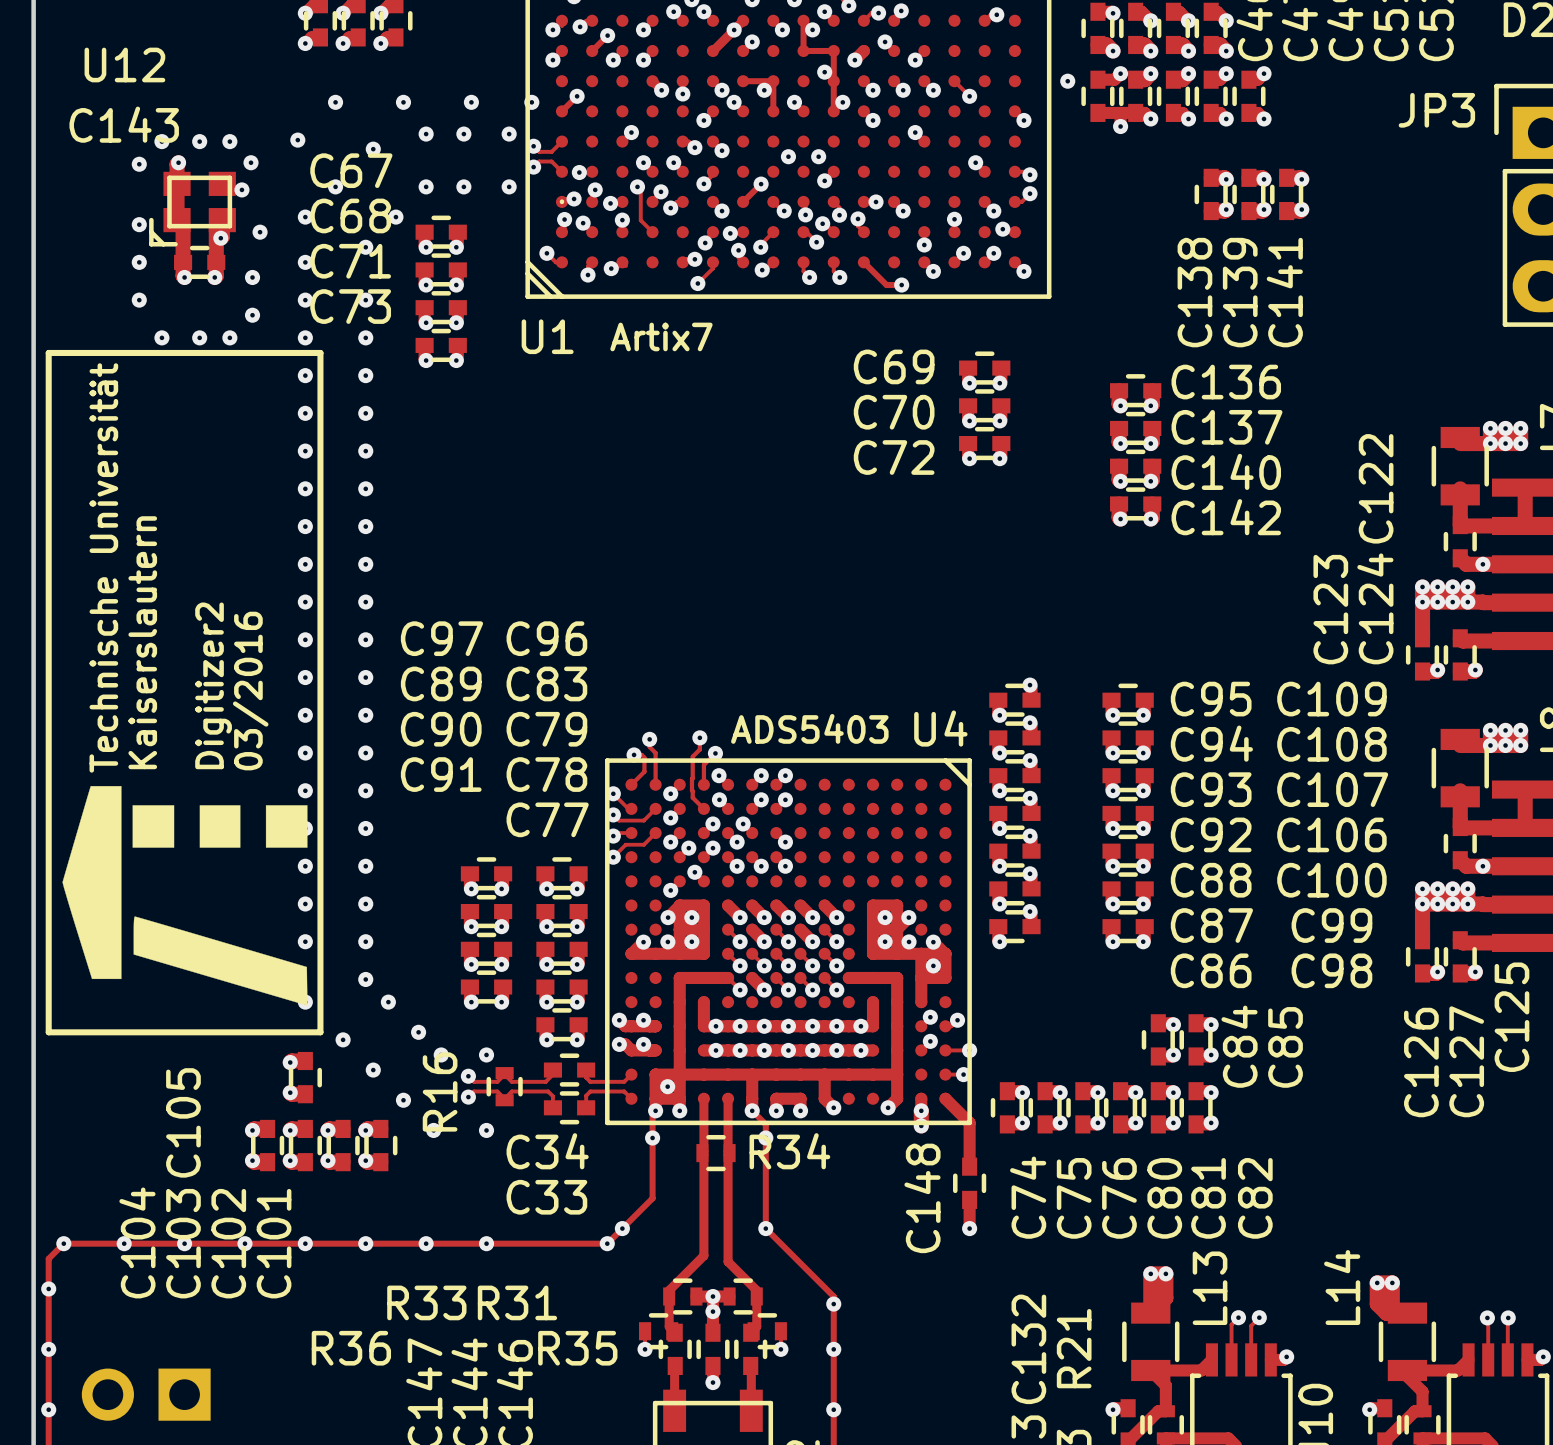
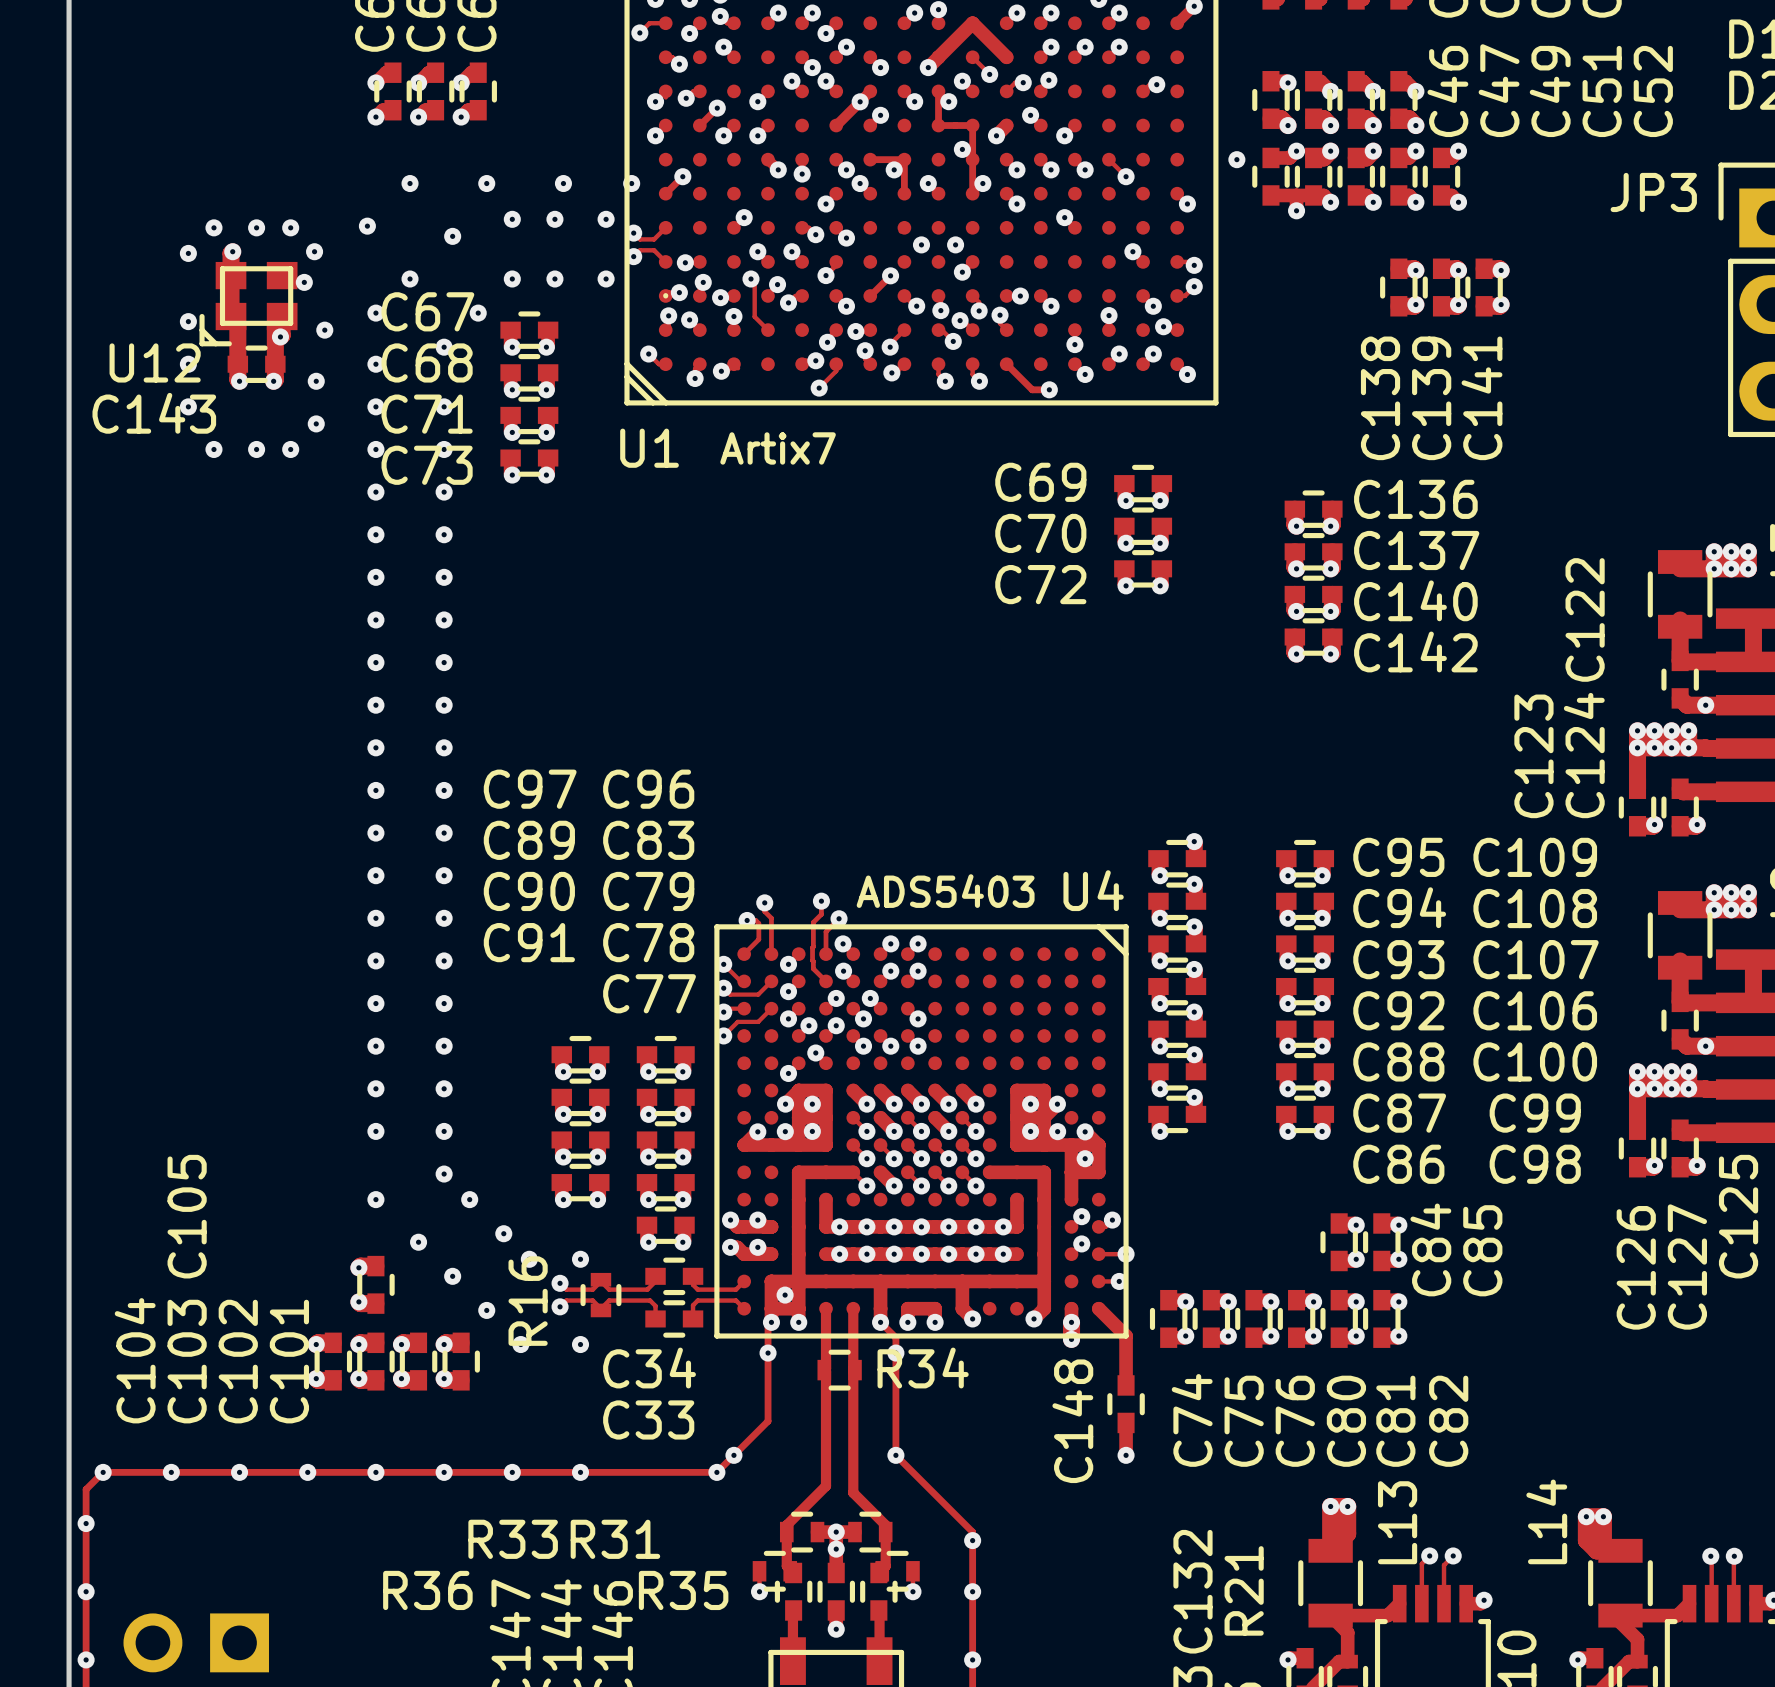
U12 name position: U12 (124, 64) -> U12 (155, 362)
C143 name position: C143 (124, 124) -> C143 (154, 413)
C67 name position: C67 (351, 170) -> C67 (427, 311)
C68 name position: C68 (350, 215) -> C68 (427, 362)
C71 name position: C71 (350, 261) -> C71 (427, 414)
C73 name position: C73 (350, 306) -> C73 (427, 465)
line: (48, 352) (48, 1032) (320, 1032) (320, 352) (48, 352) -> none
text: Technische Universität (103, 567) -> none
text: Kaiserslautern (142, 642) -> none
text: Digitizer2 (213, 685) -> none
text: 03/2016 (250, 691) -> none
drawing: [62, 786, 308, 1006] -> none
C105 name position: C105 (183, 1122) -> C105 (187, 1216)
C104 name position: C104 (137, 1242) -> C104 (135, 1360)
C103 name position: C103 (183, 1243) -> C103 (187, 1361)
C102 name position: C102 (228, 1243) -> C102 (238, 1361)
C101 name position: C101 (274, 1243) -> C101 (289, 1361)

